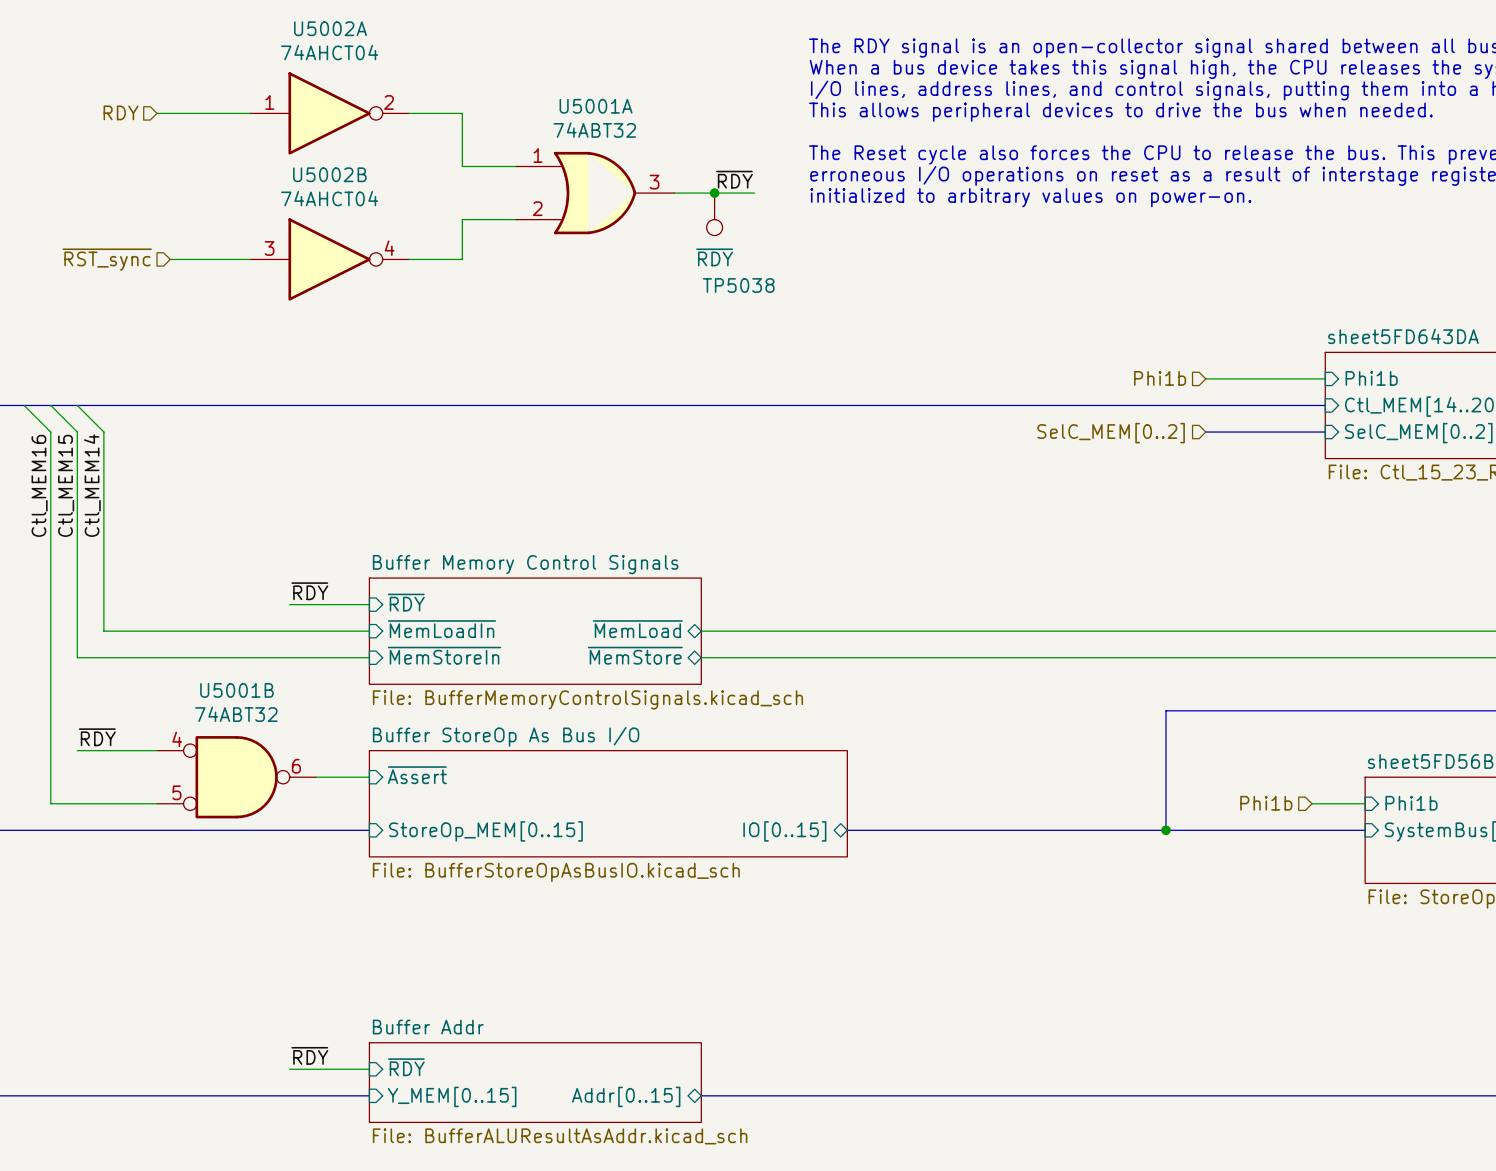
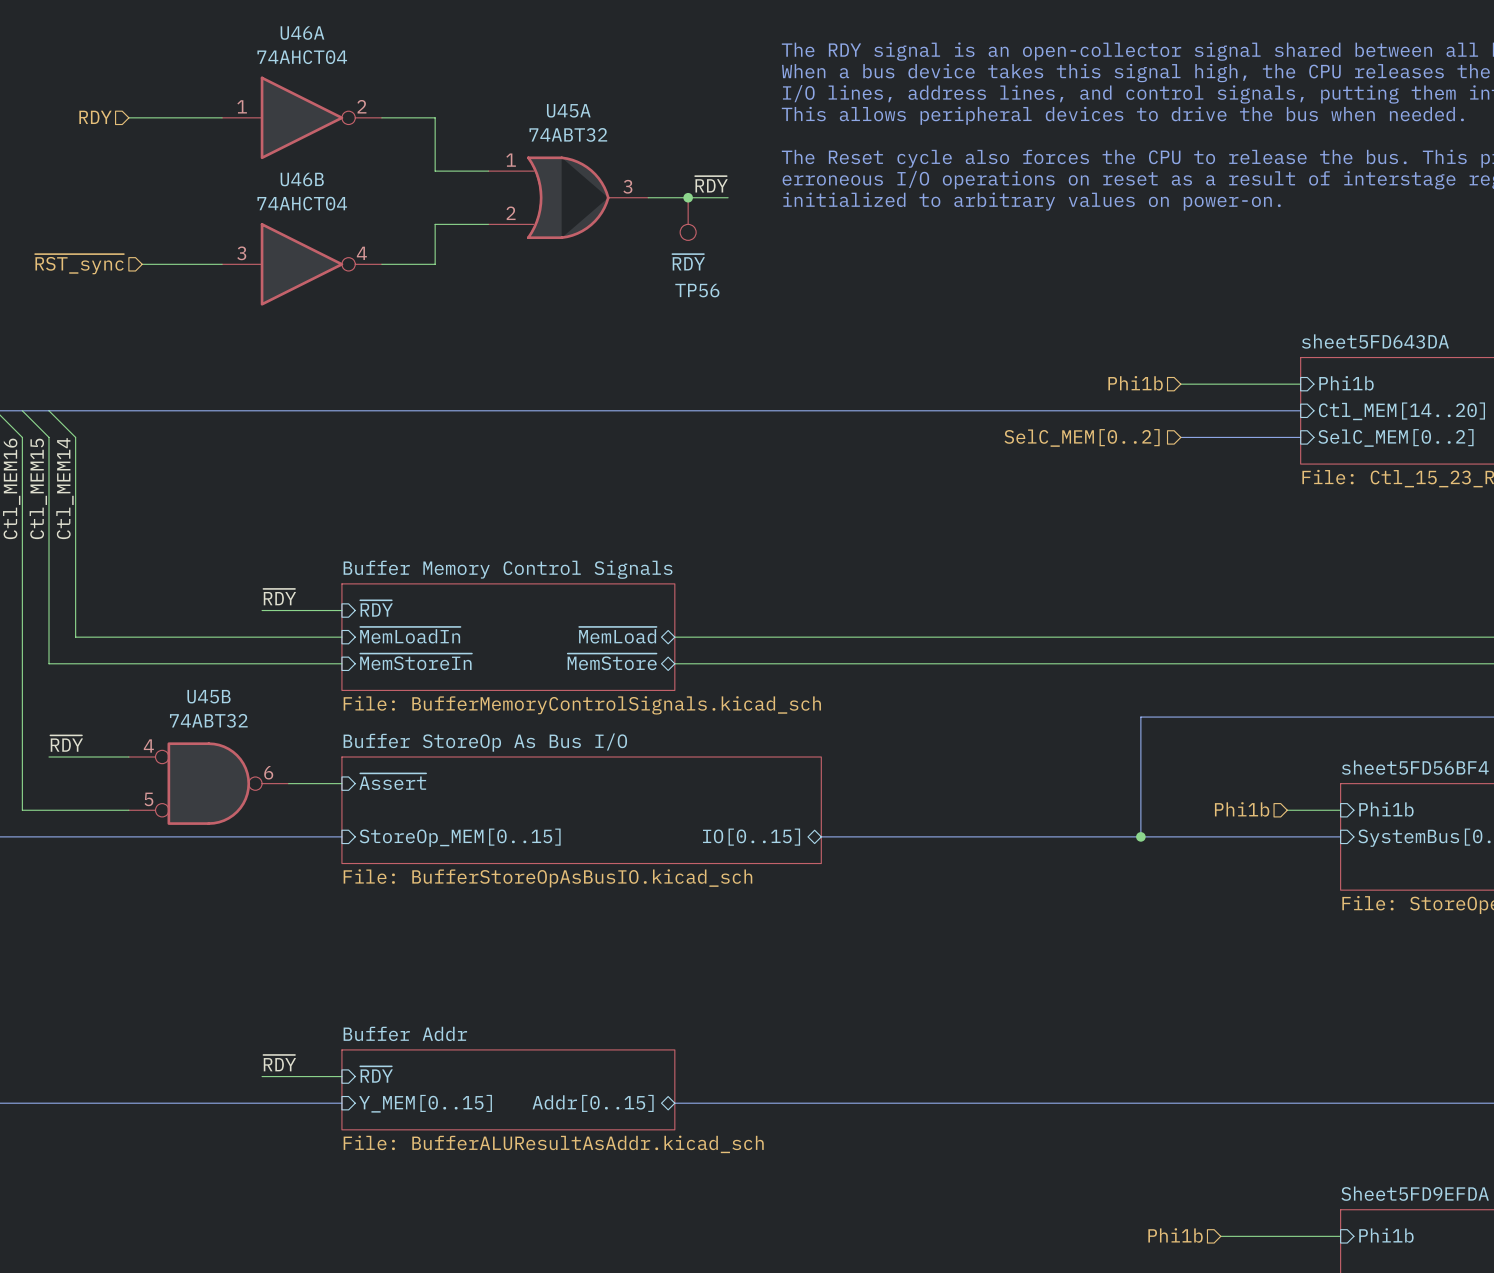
U5002A name: U5002A (330, 28) -> U46A (302, 33)
U5001A name: U5001A (596, 106) -> U45A (568, 110)
U5002B name: U5002B (329, 174) -> U46B (302, 179)
TP5038 name: TP5038 (738, 285) -> TP56 (697, 290)
U5001B name: U5001B (236, 690) -> U45B (209, 696)

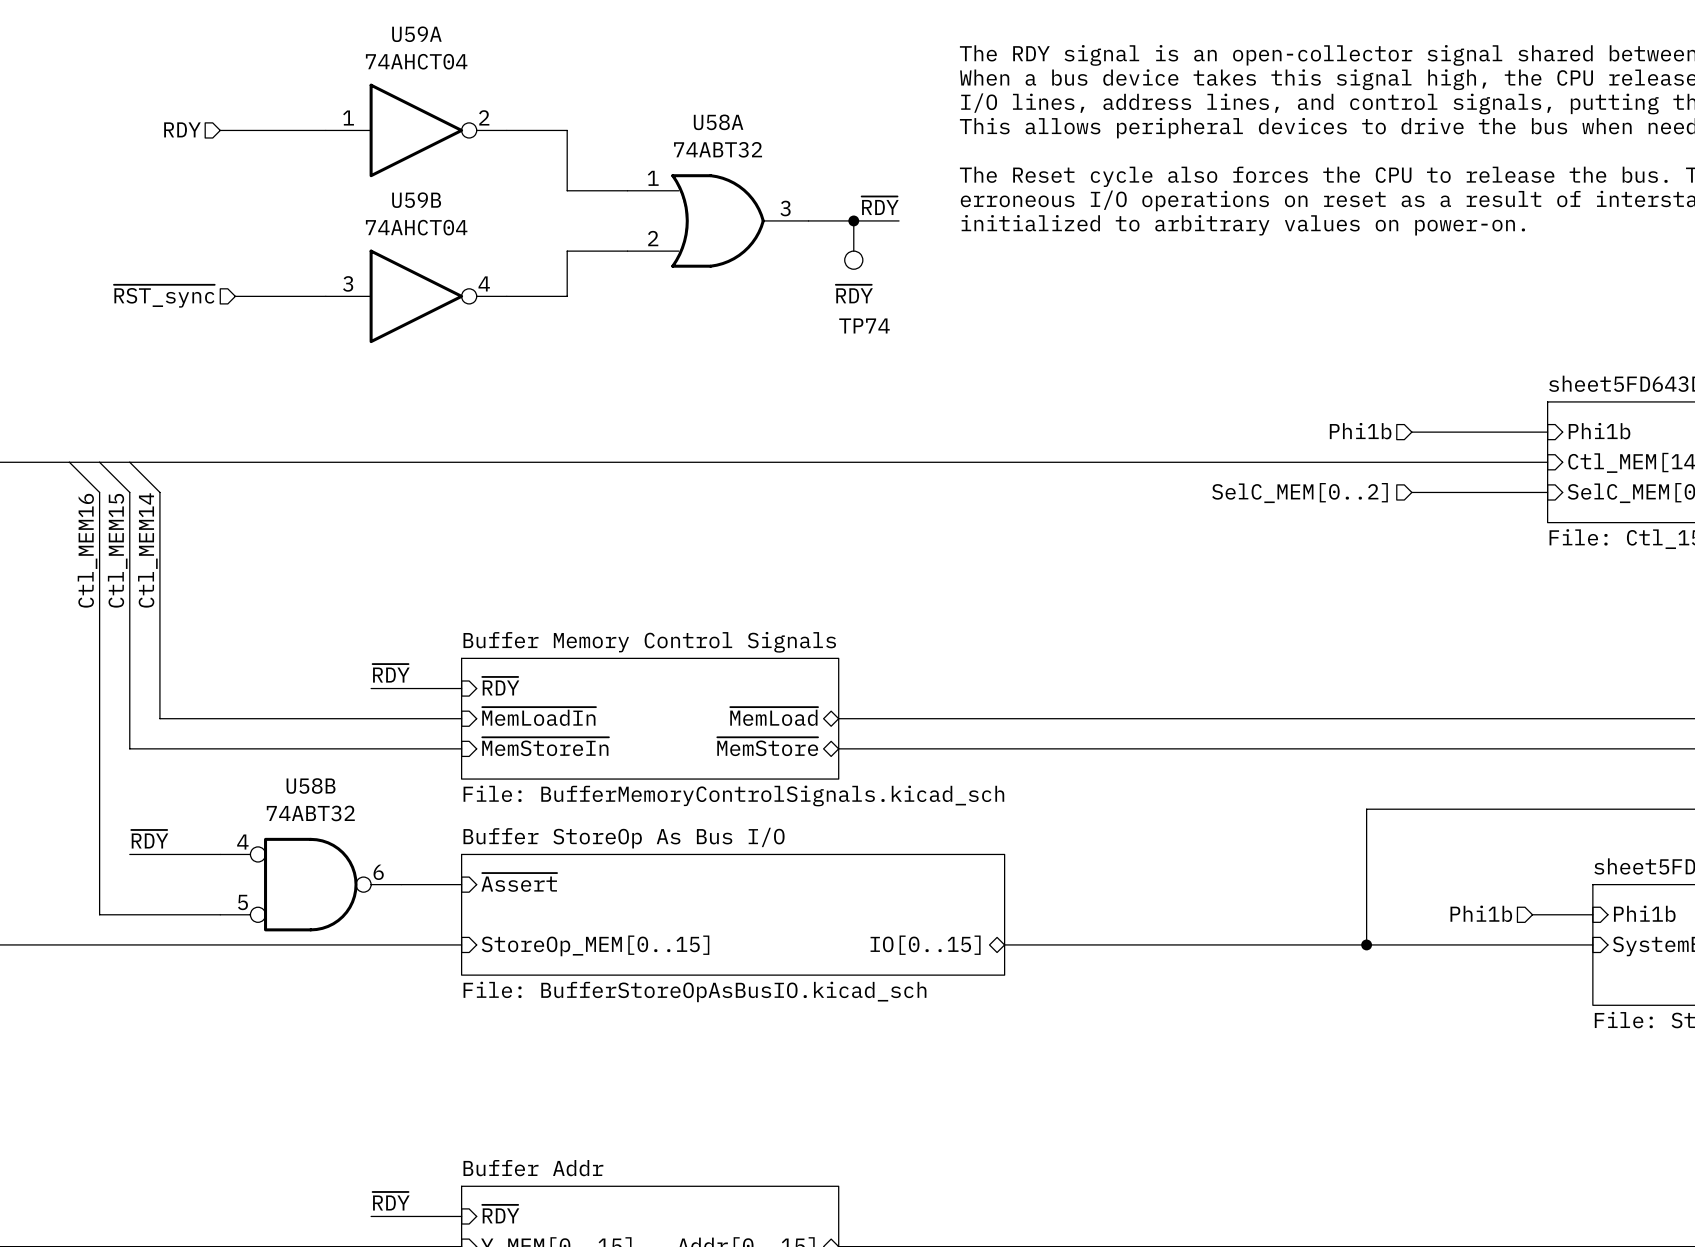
U46A name: U46A (302, 33) -> U59A (416, 34)
U45A name: U45A (568, 110) -> U58A (718, 122)
U46B name: U46B (302, 179) -> U59B (416, 200)
TP56 name: TP56 (697, 290) -> TP74 (864, 325)
U45B name: U45B (209, 696) -> U58B (311, 786)

